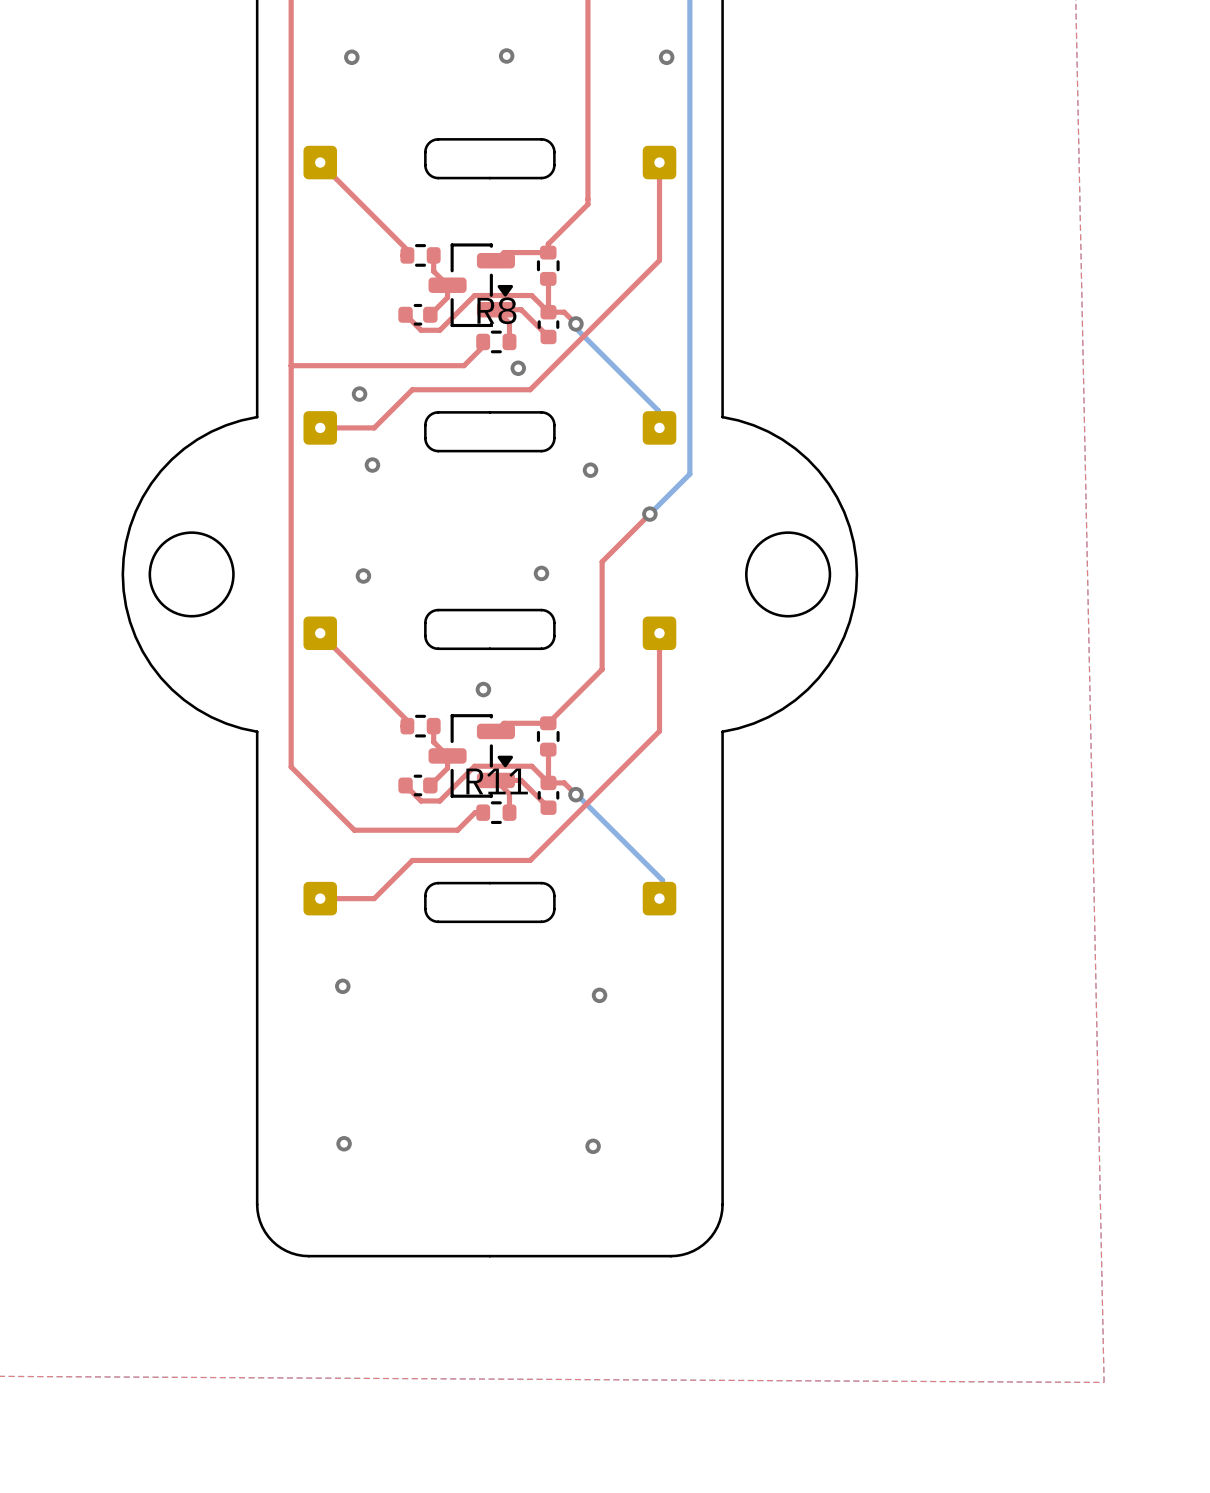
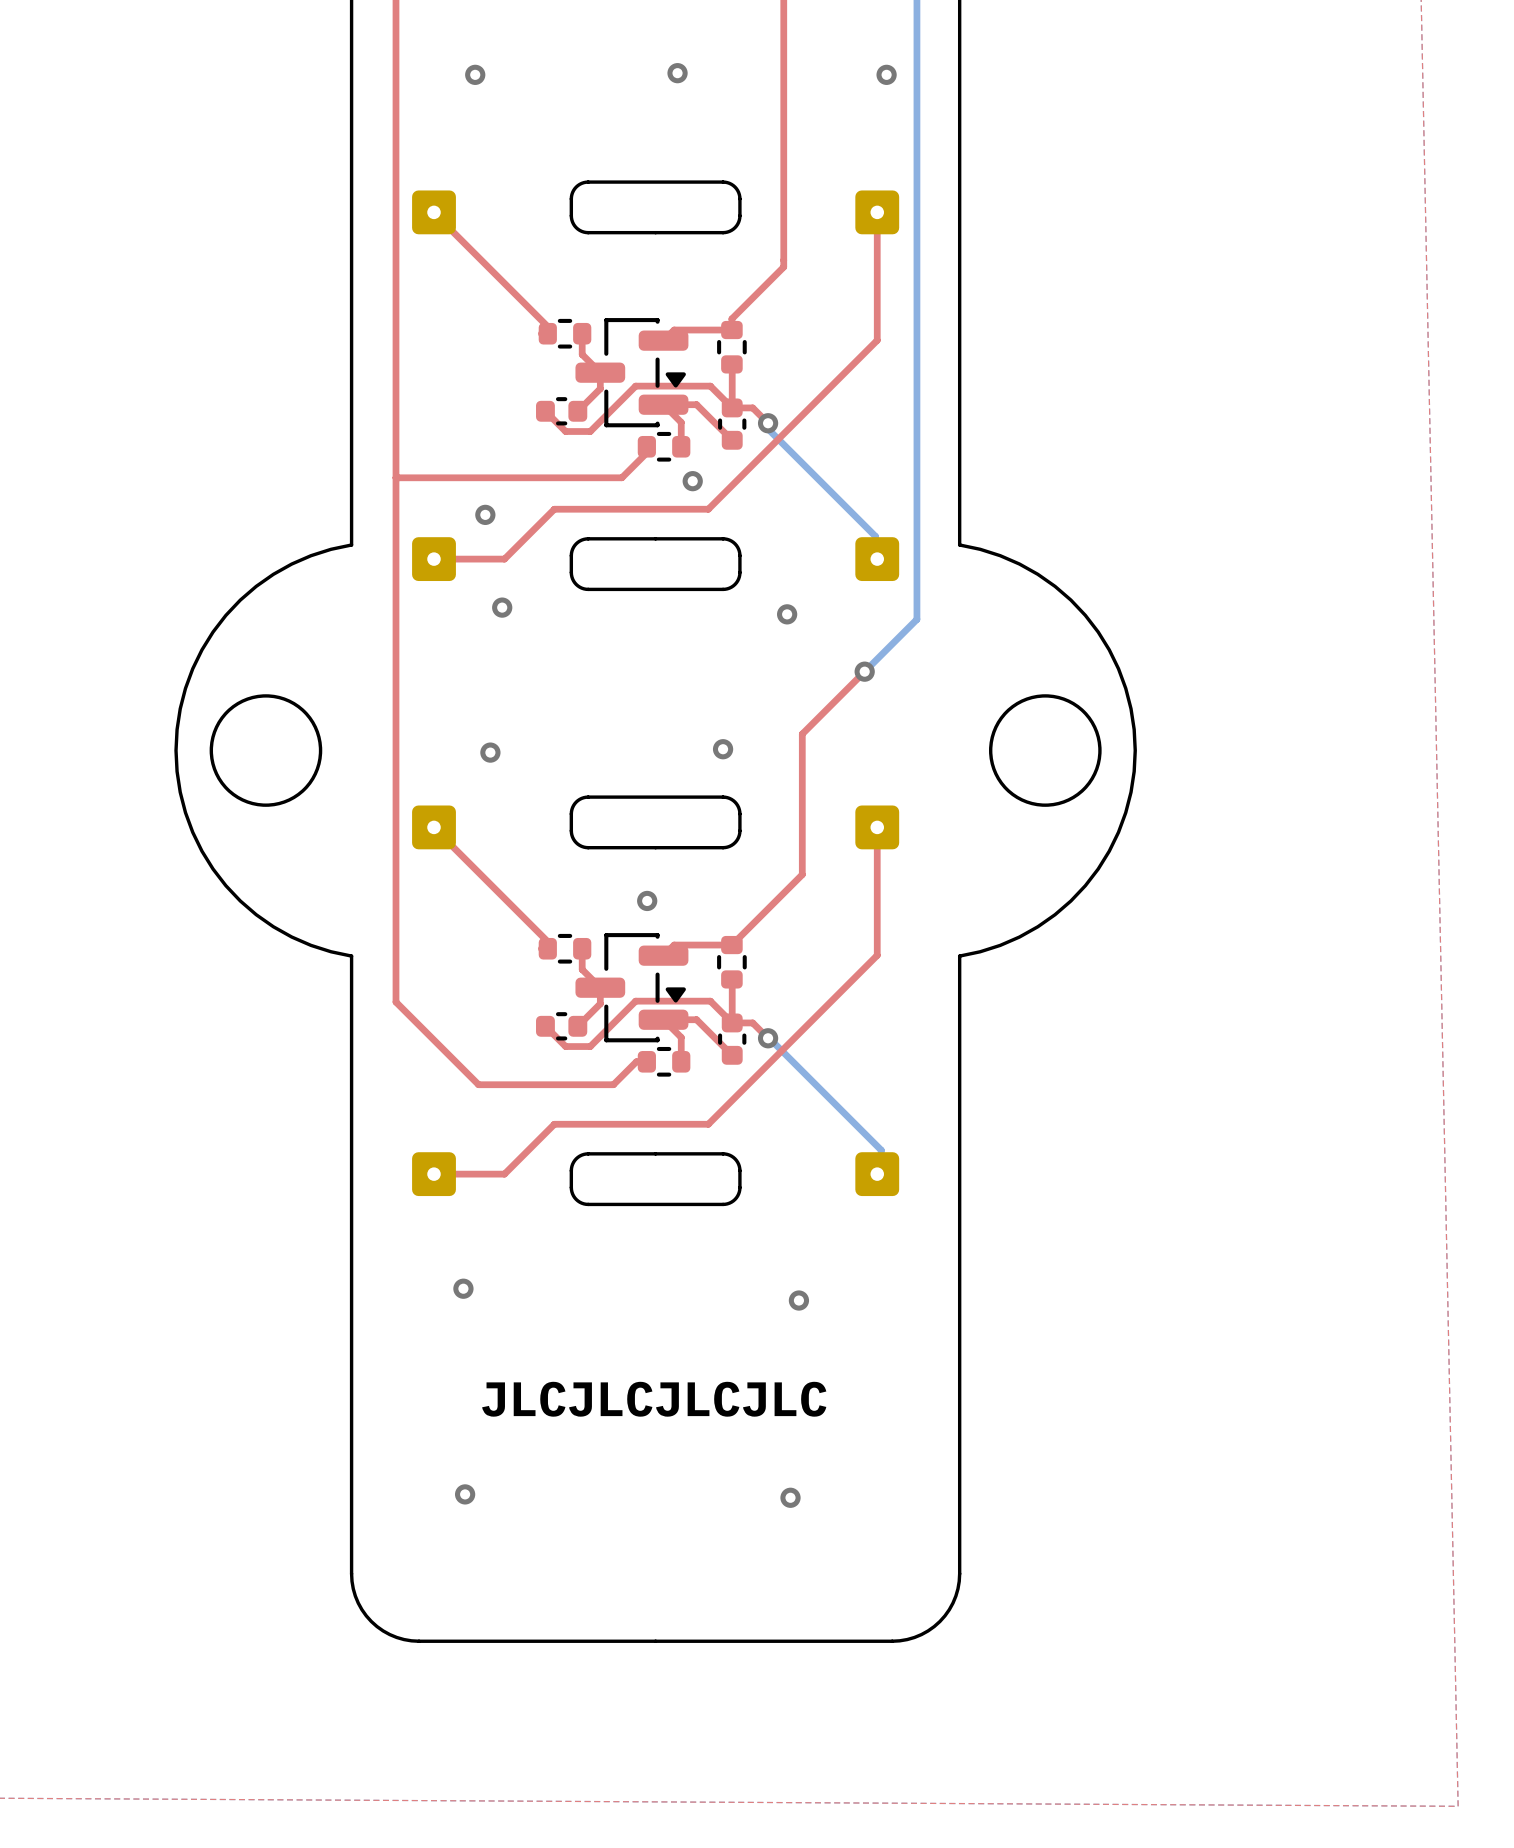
R8 name: R8 (496, 310) -> none
R11 name: R11 (497, 781) -> none
text: none -> JLCJLCJLCJLC (654, 1399)

